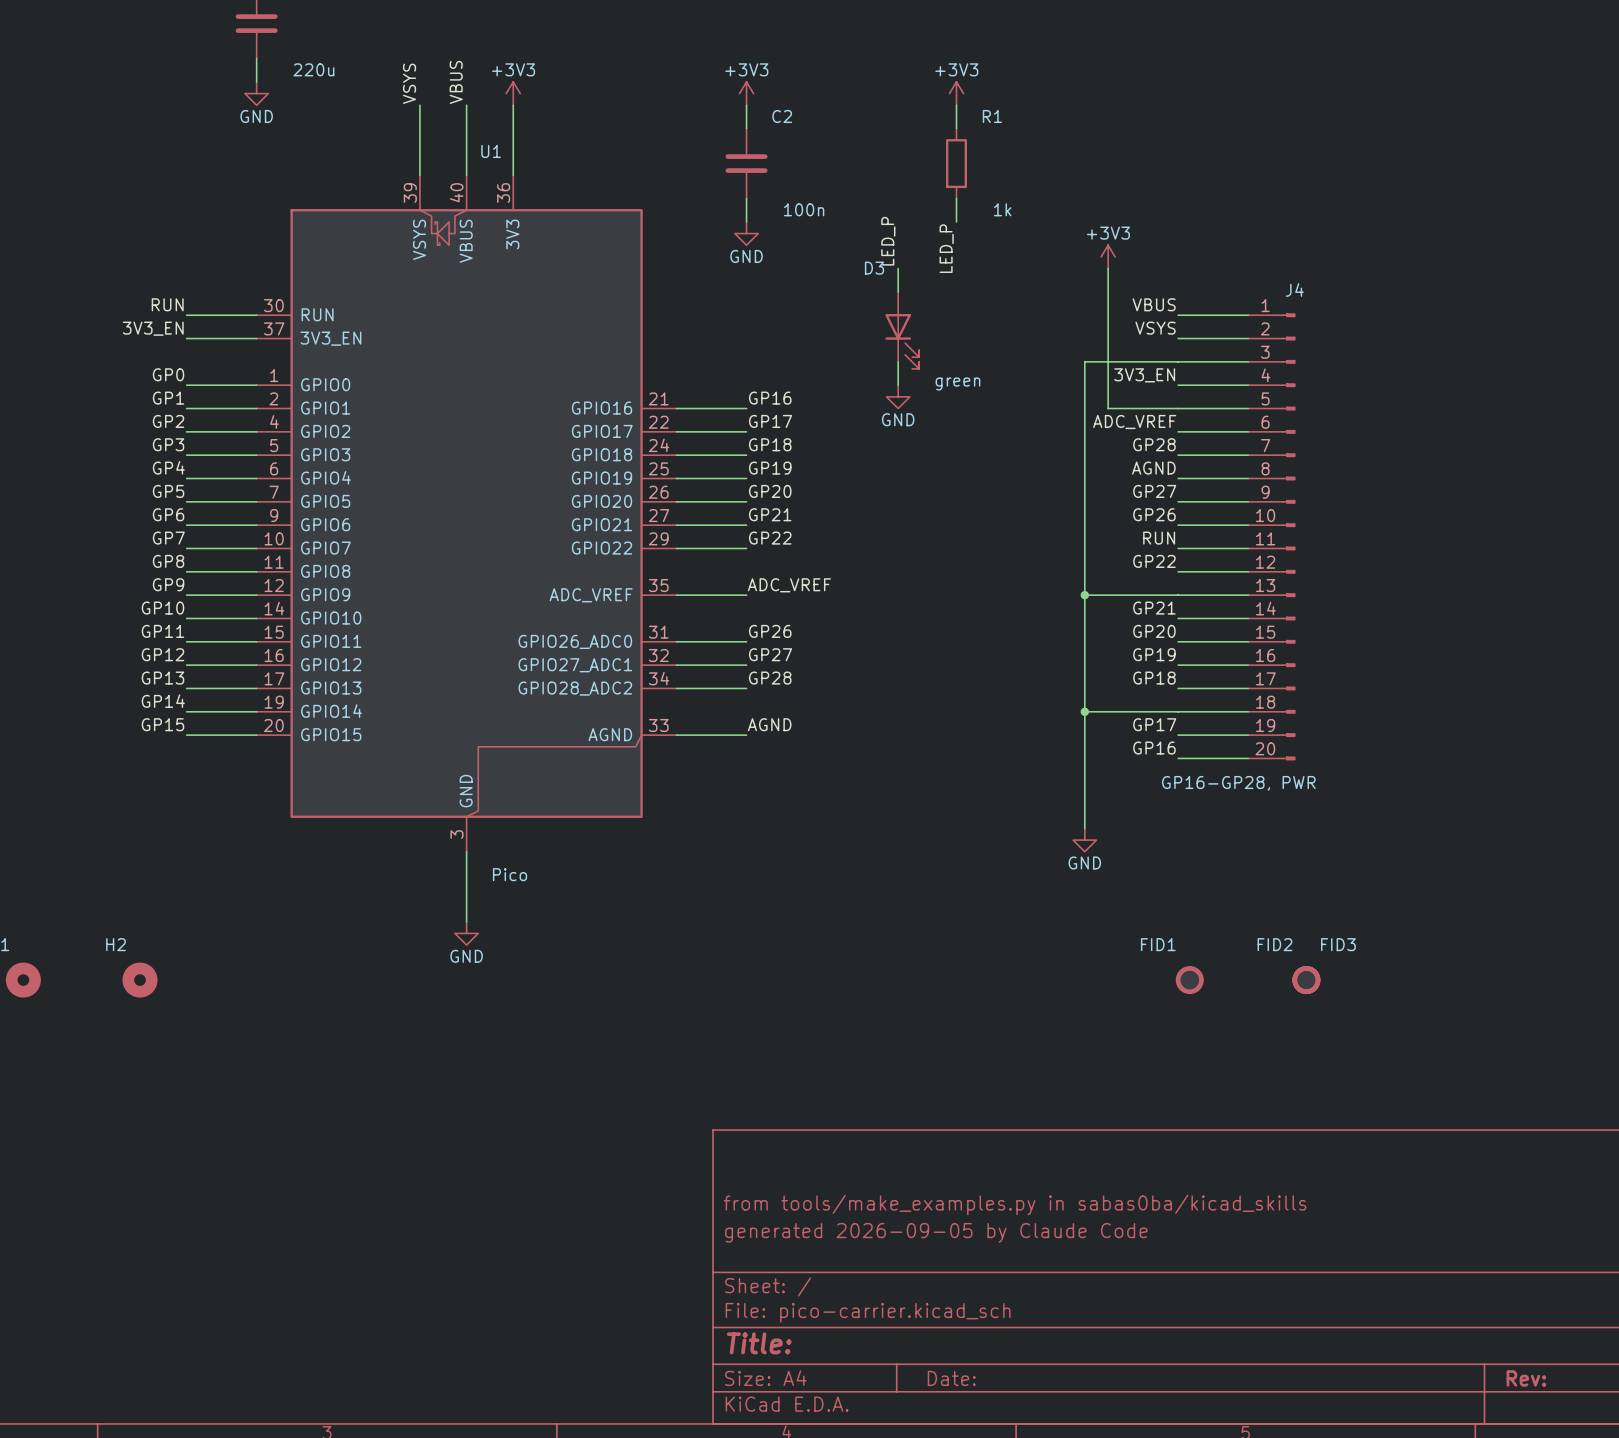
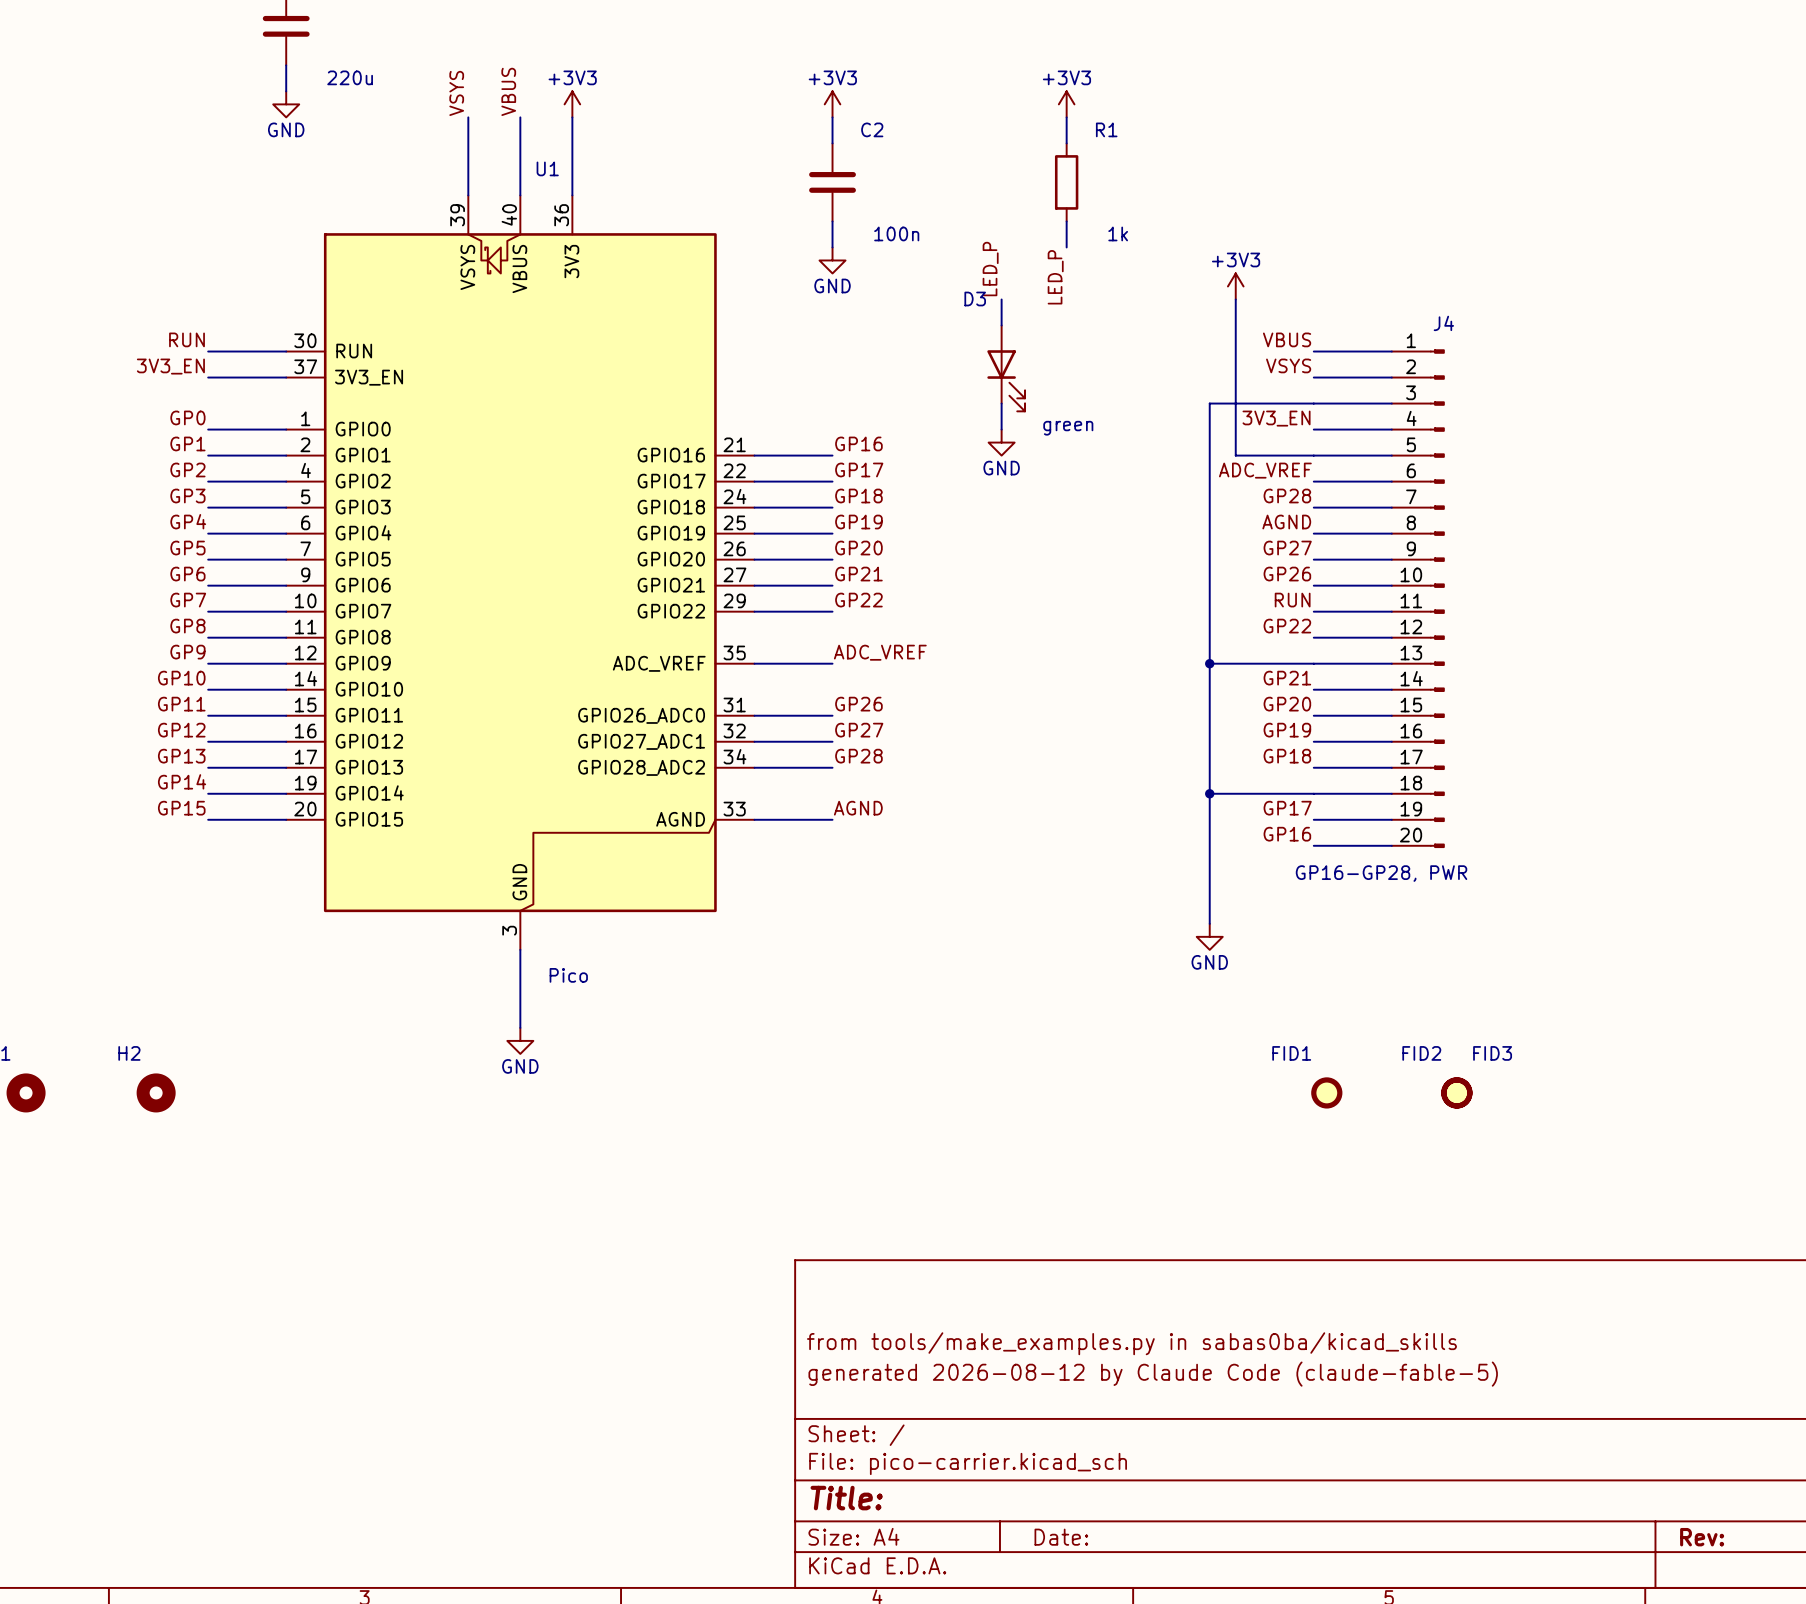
title block: generated 2026-09-05 by Claude Code (936, 1232) -> generated 2026-08-12 by Claude Code (claude-fable-5) (1153, 1374)

